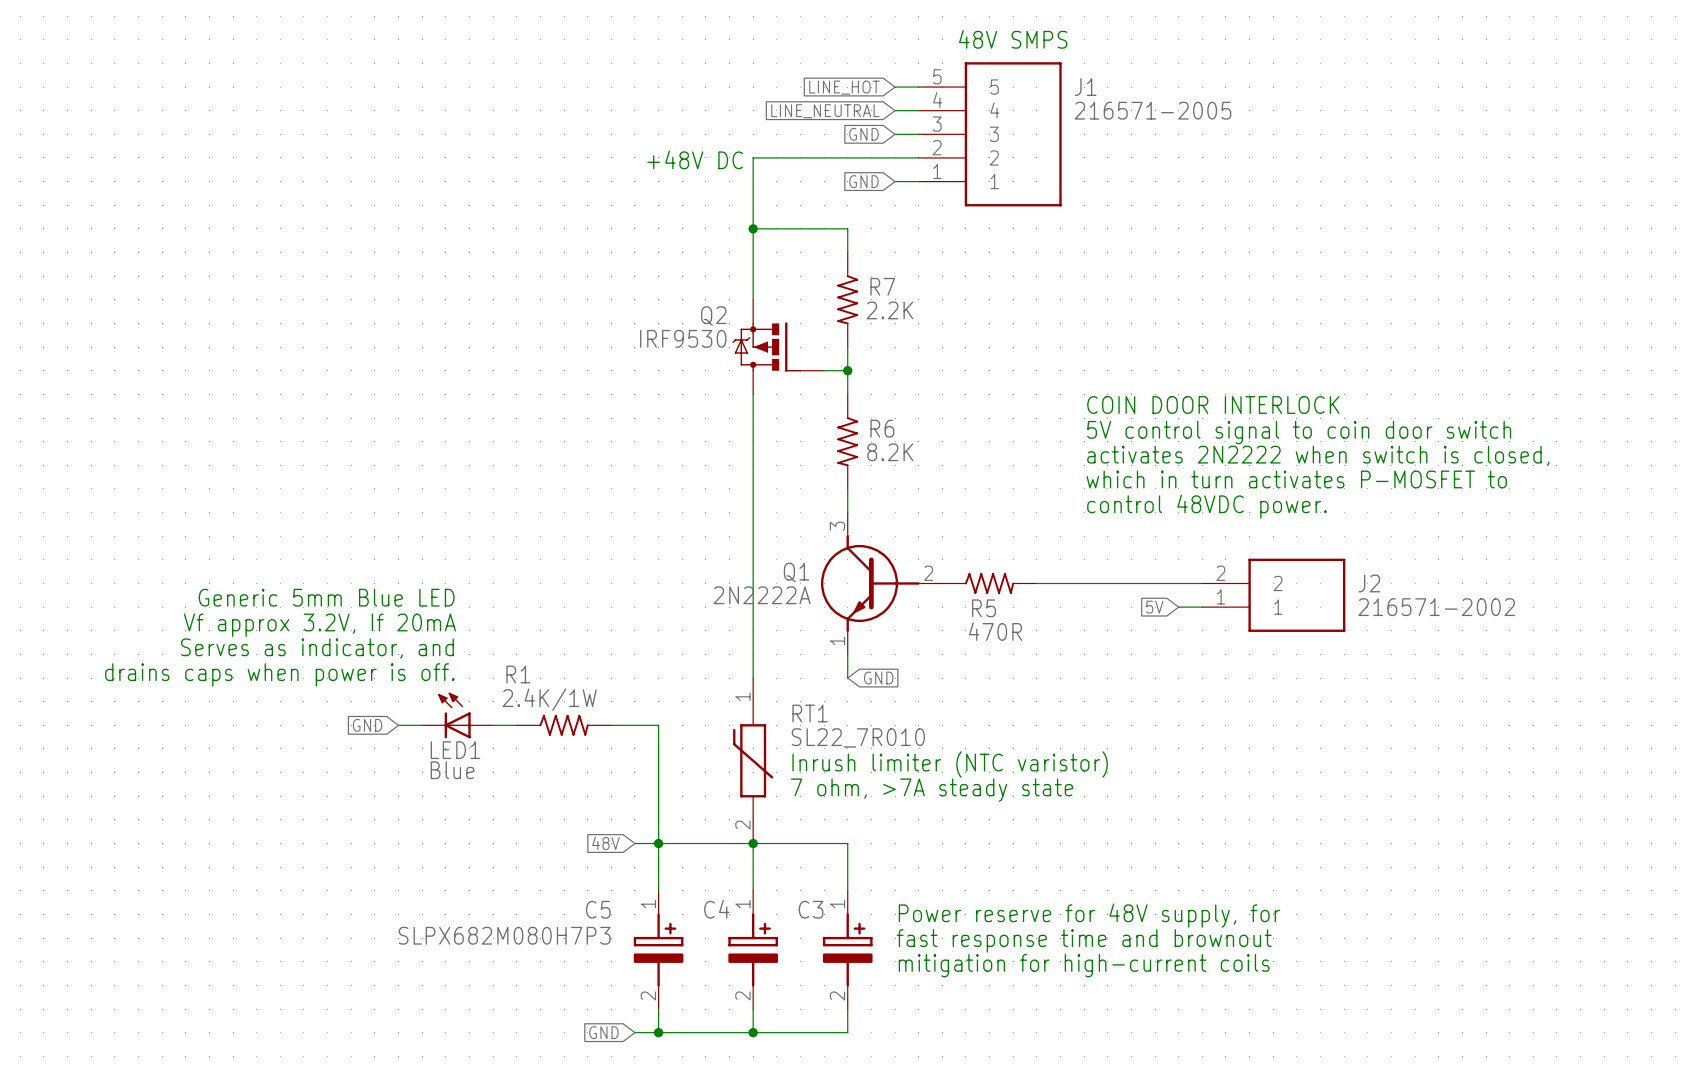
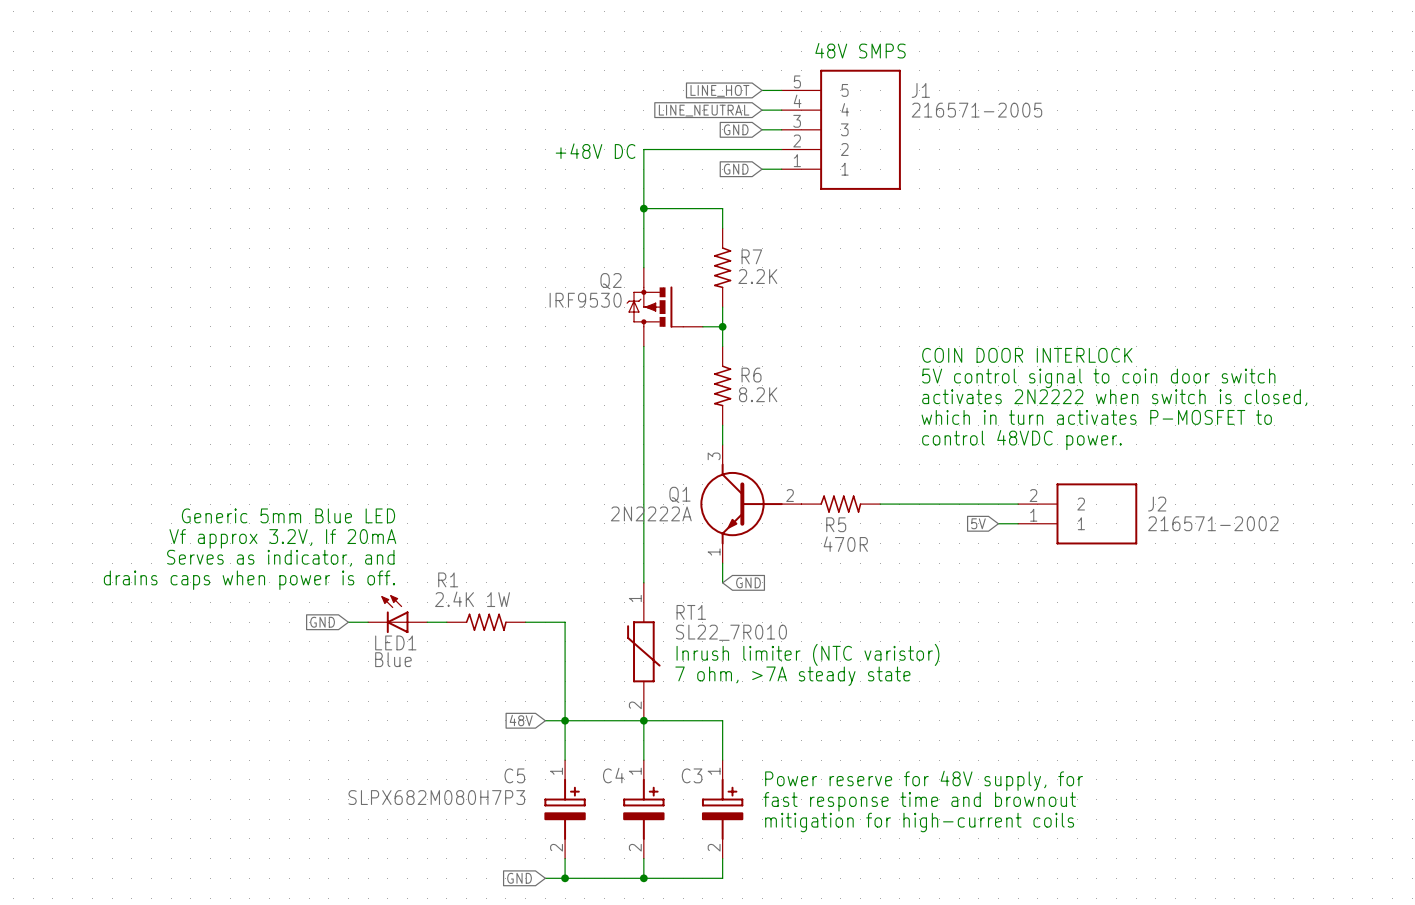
R1 value: 2.4K/1W (549, 699) -> 2.4K 1W (472, 599)

